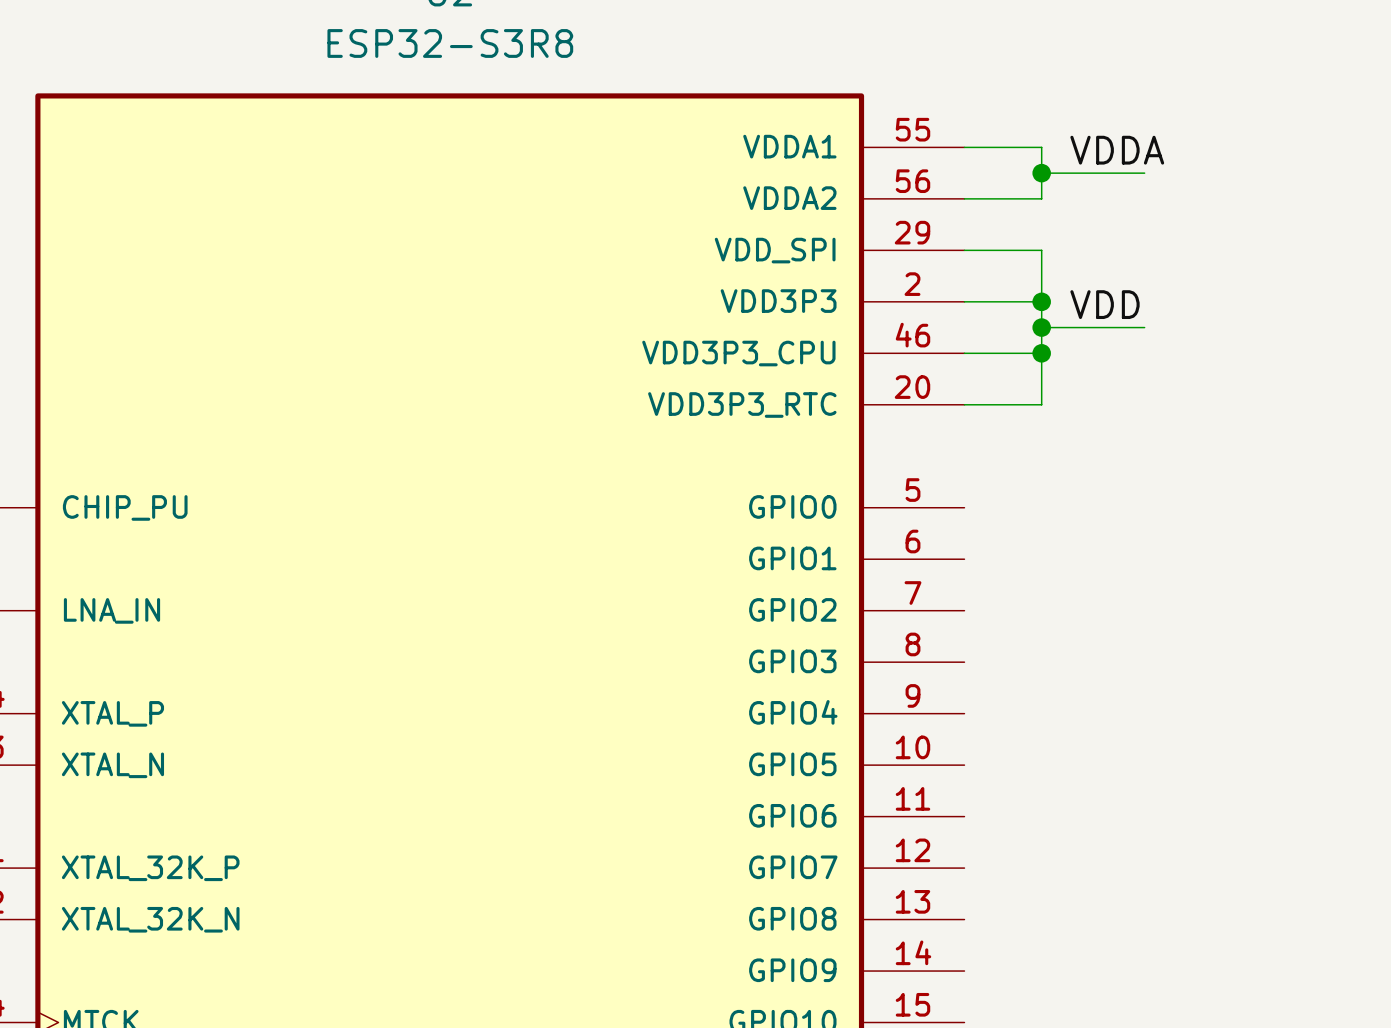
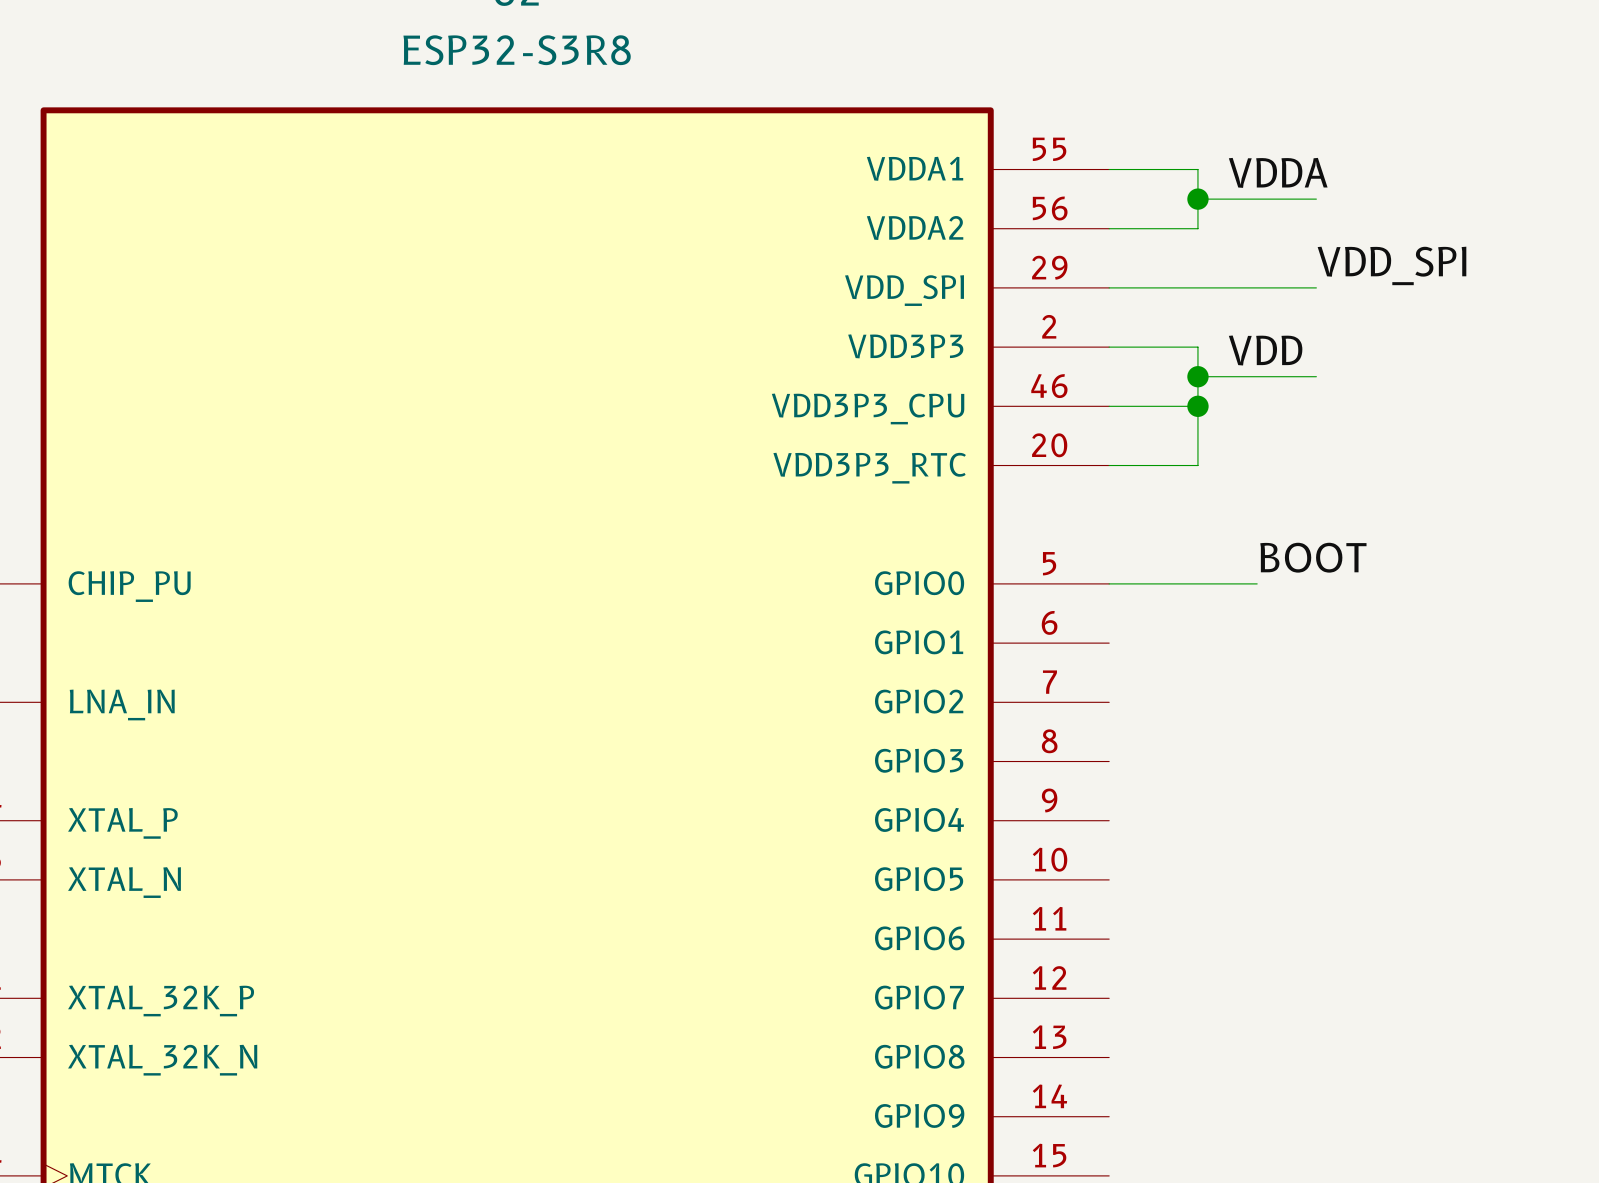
label: none -> VDD_SPI (1391, 265)
wire: (1041, 250) (1041, 301) -> (1197, 287) (1316, 287)
junction: (1041, 301) -> none
label: none -> BOOT (1313, 557)
wire: none -> (1109, 583) (1257, 583)

